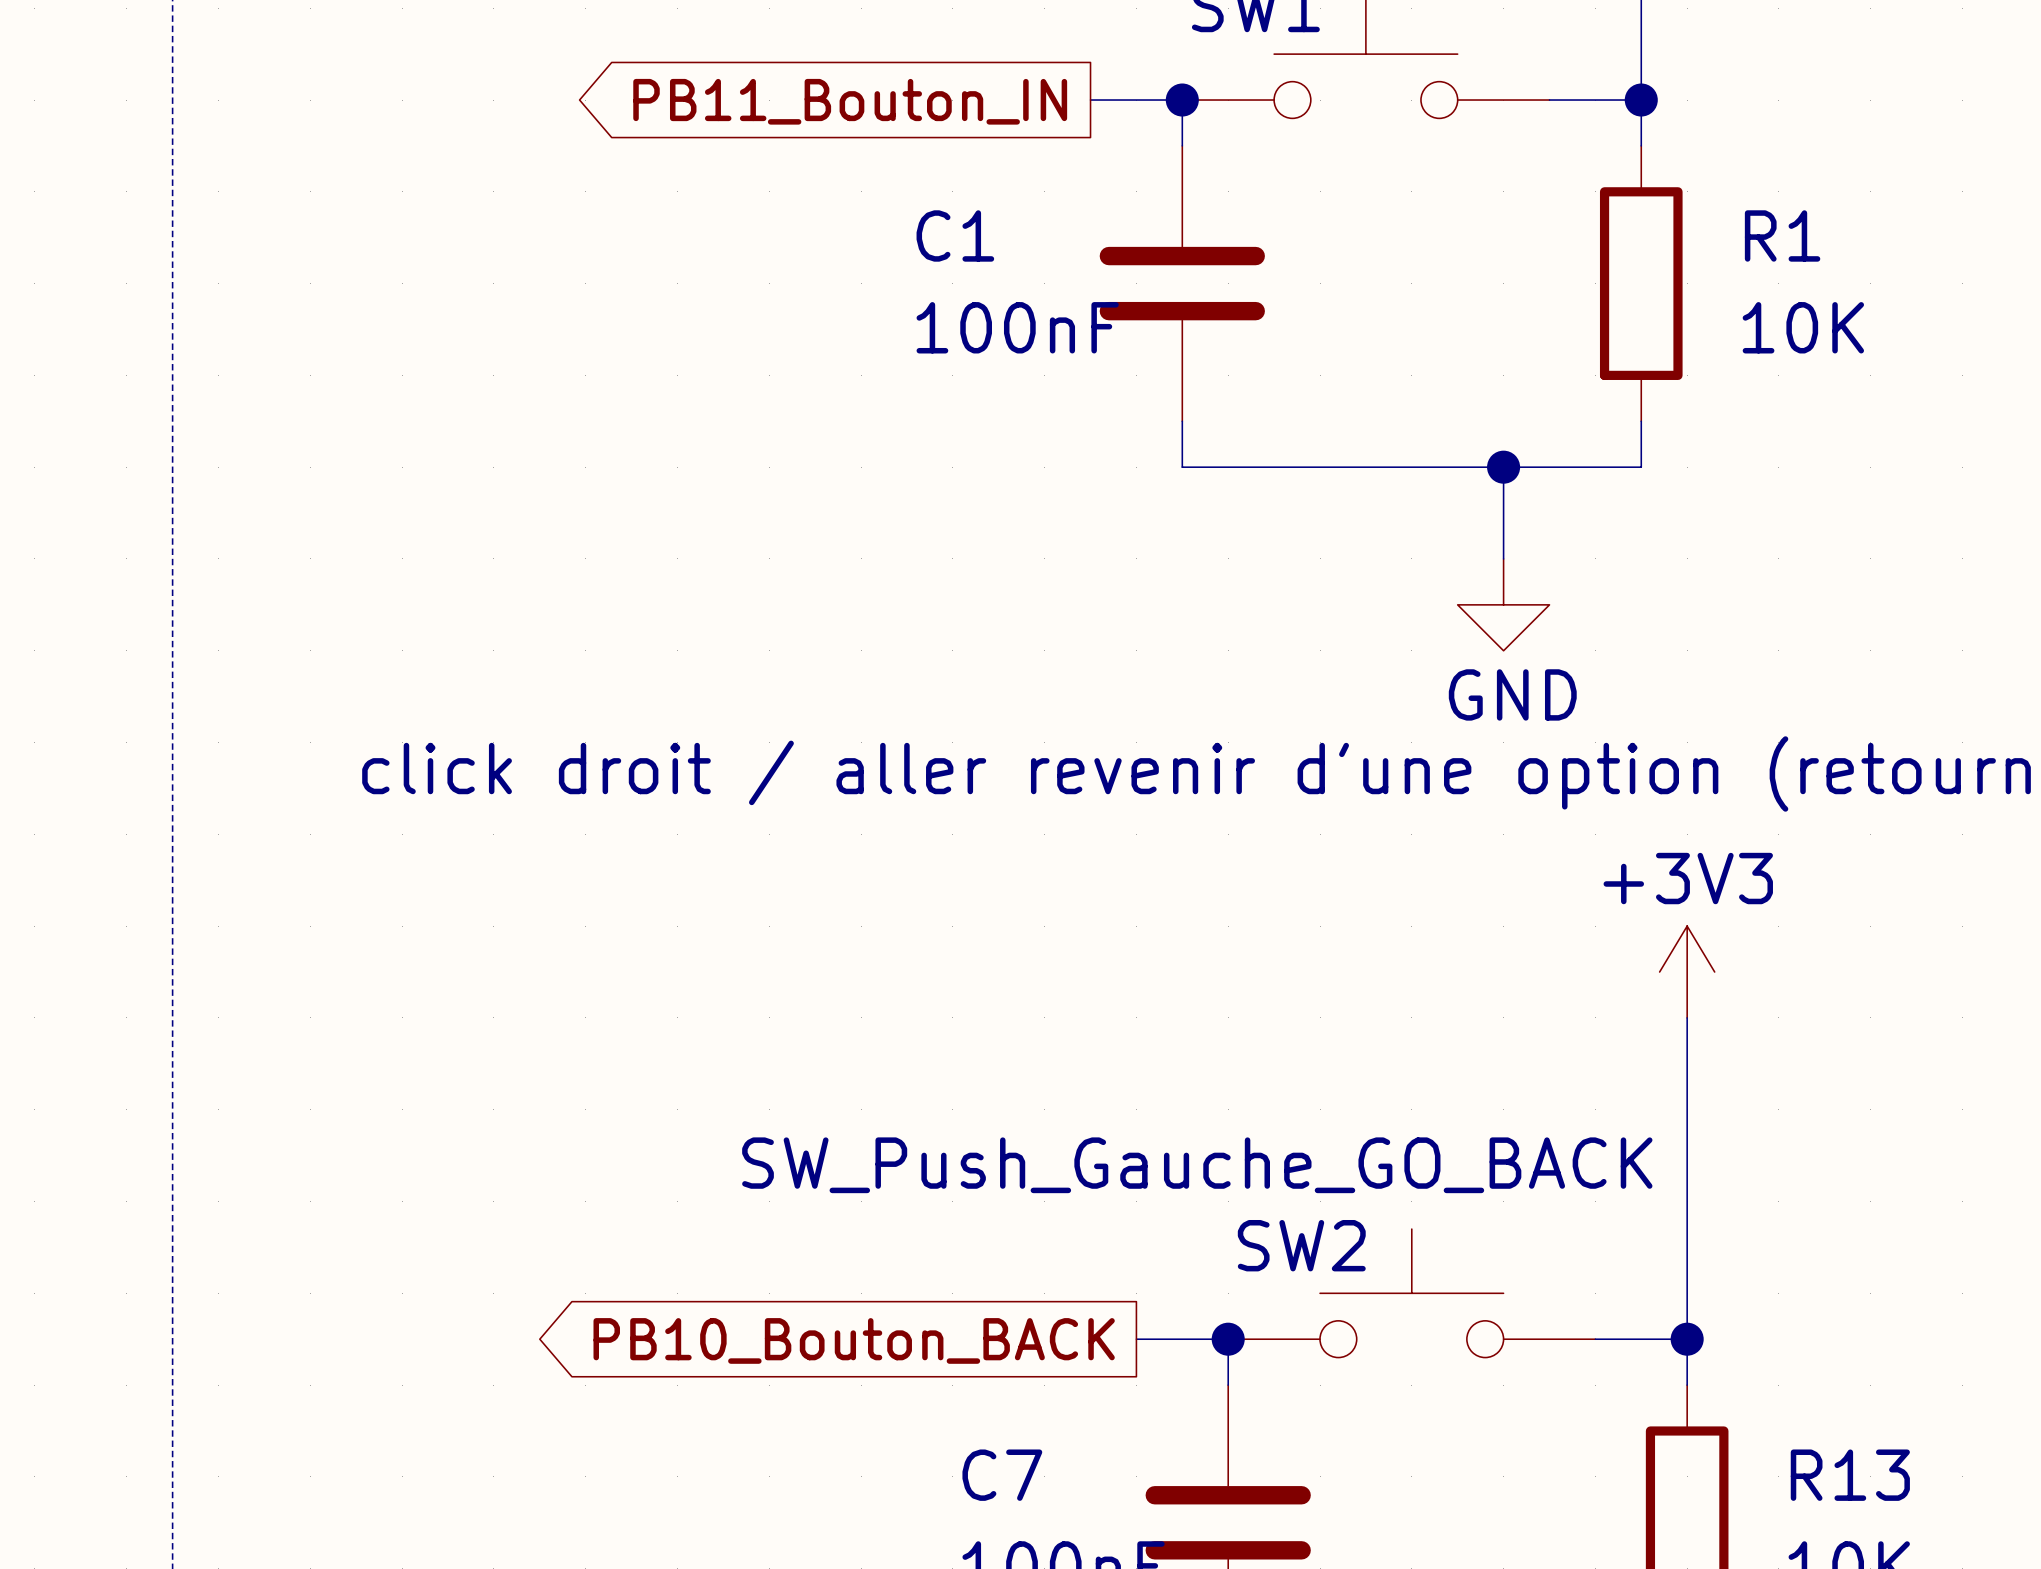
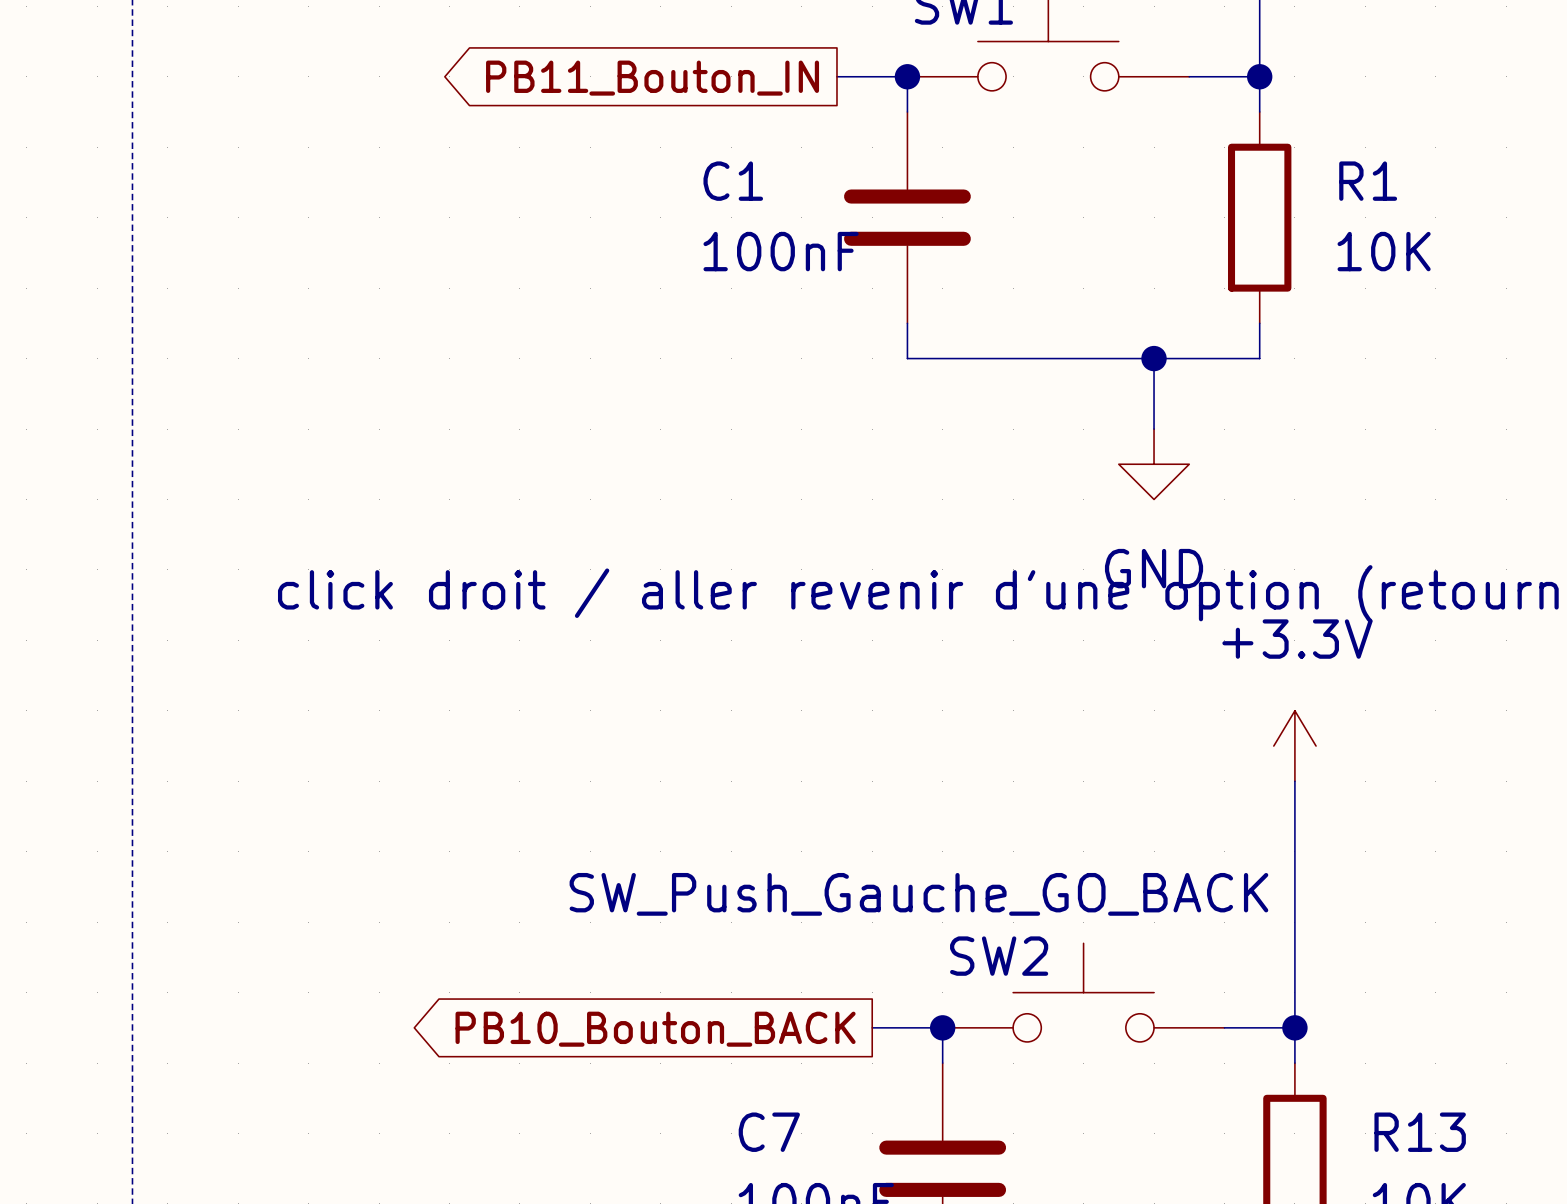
power symbol text position: GND (1512, 694) -> GND (1154, 568)
power symbol: +3V3 (1687, 972) -> +3.3V (1294, 746)

